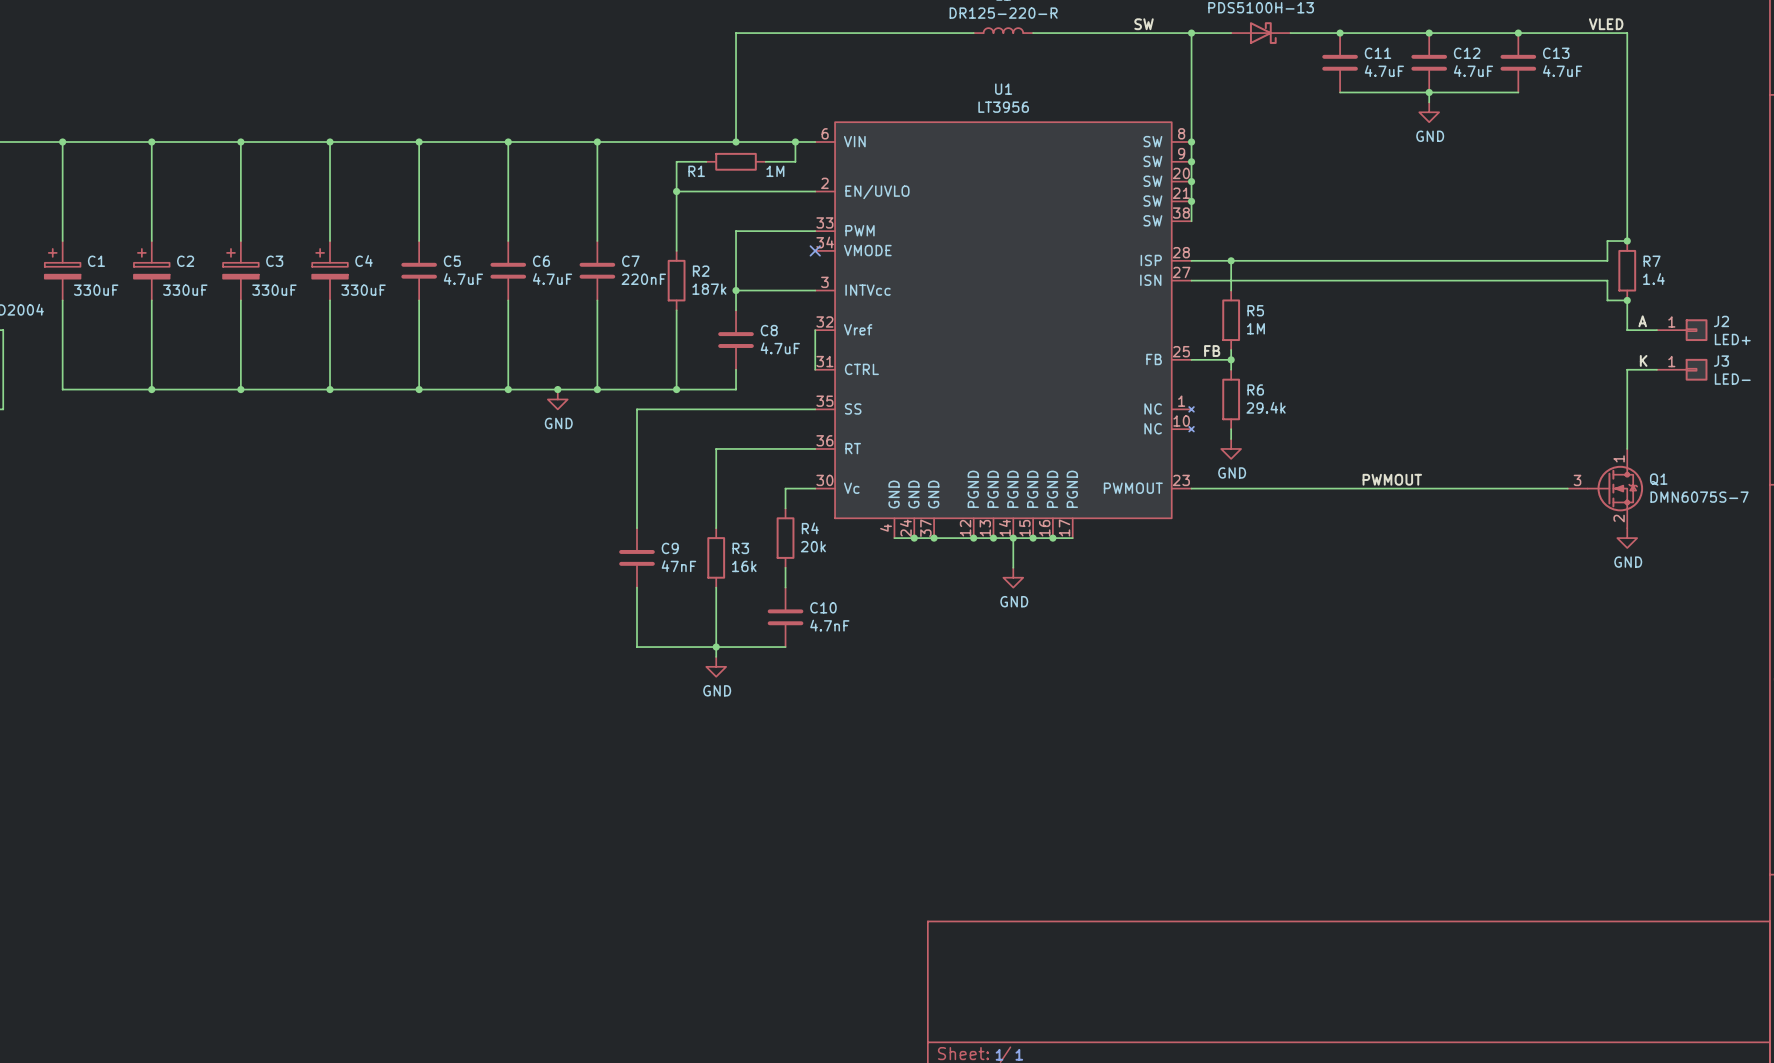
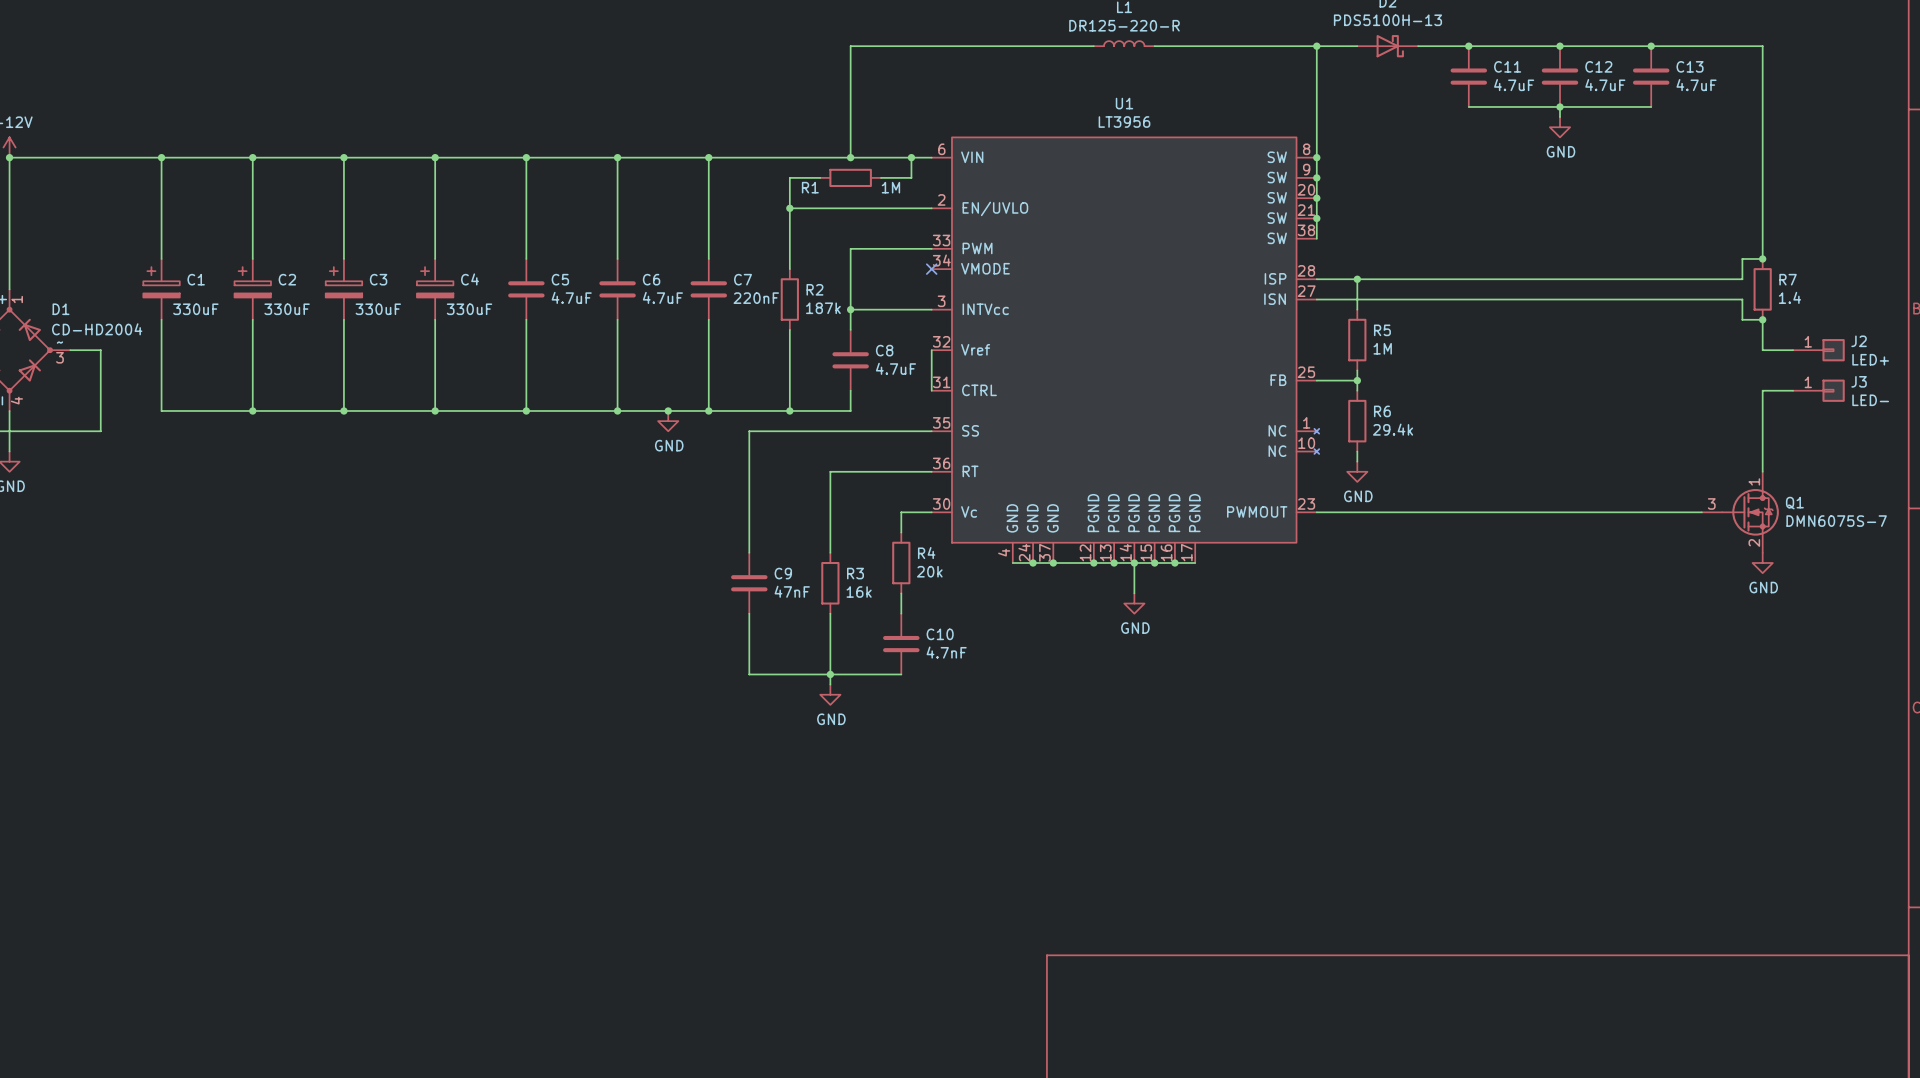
label: SW (1144, 24) -> none
label: VLED (1606, 24) -> none
label: A (1642, 321) -> none
label: FB (1212, 351) -> none
label: K (1643, 360) -> none
label: PWMOUT (1392, 479) -> none

